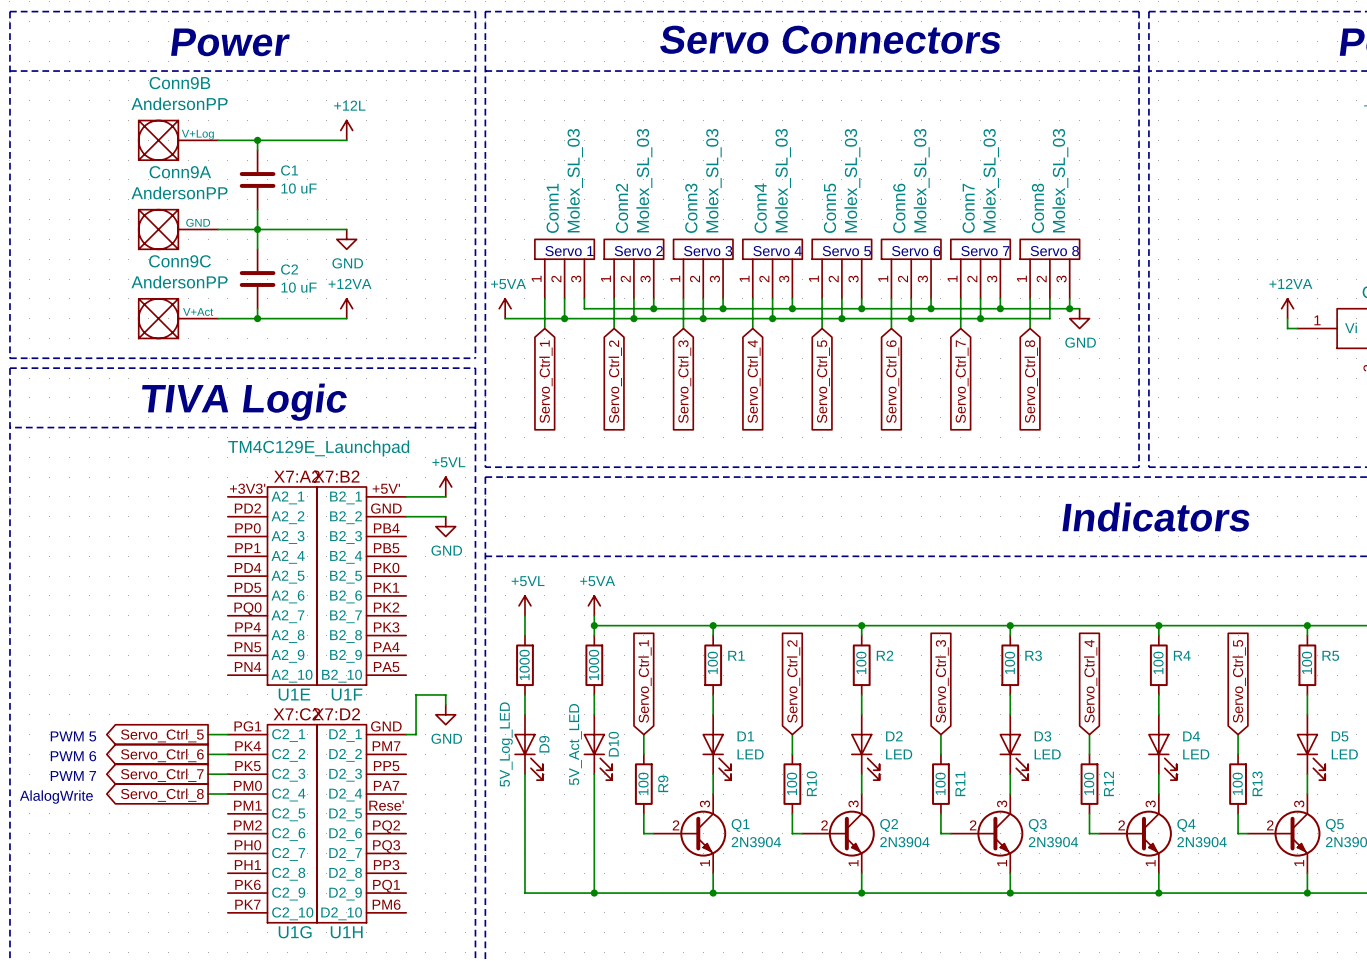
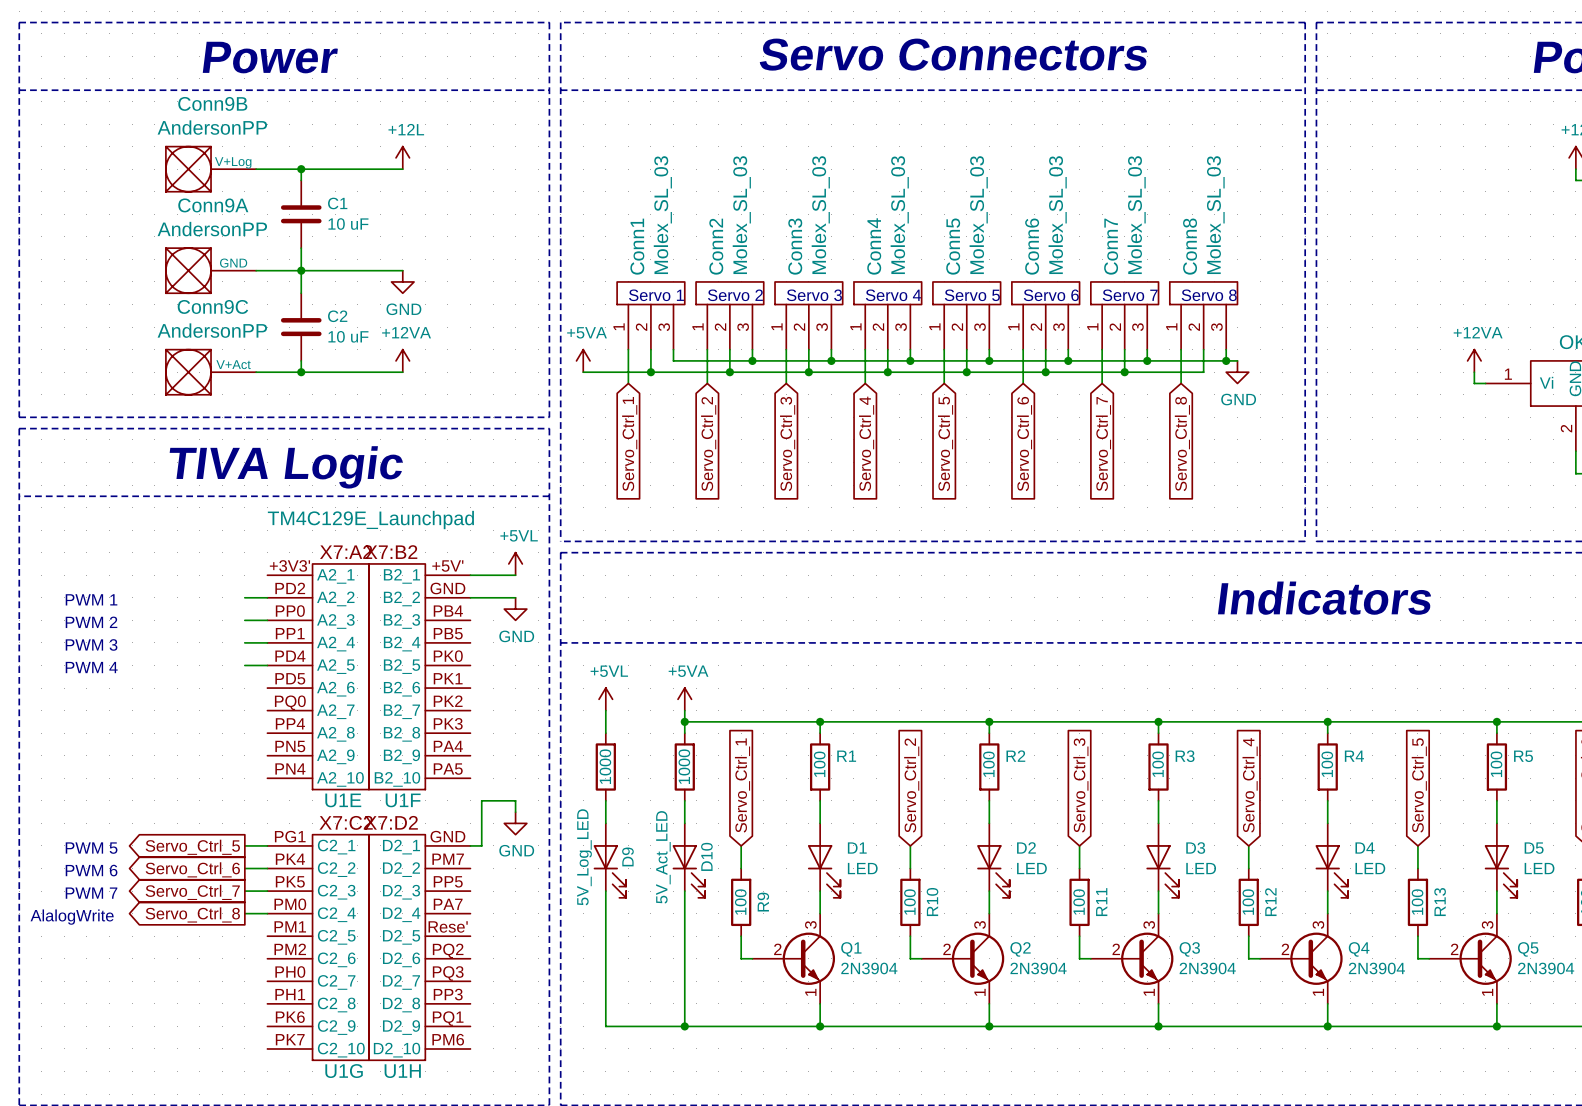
wire: none -> (244, 597) (267, 597)
text: none -> PWM 1 (91, 599)
wire: none -> (244, 620) (267, 620)
text: none -> PWM 2 (91, 622)
wire: none -> (244, 642) (267, 642)
text: none -> PWM 3 (91, 644)
wire: none -> (244, 665) (267, 665)
text: none -> PWM 4 (91, 667)

